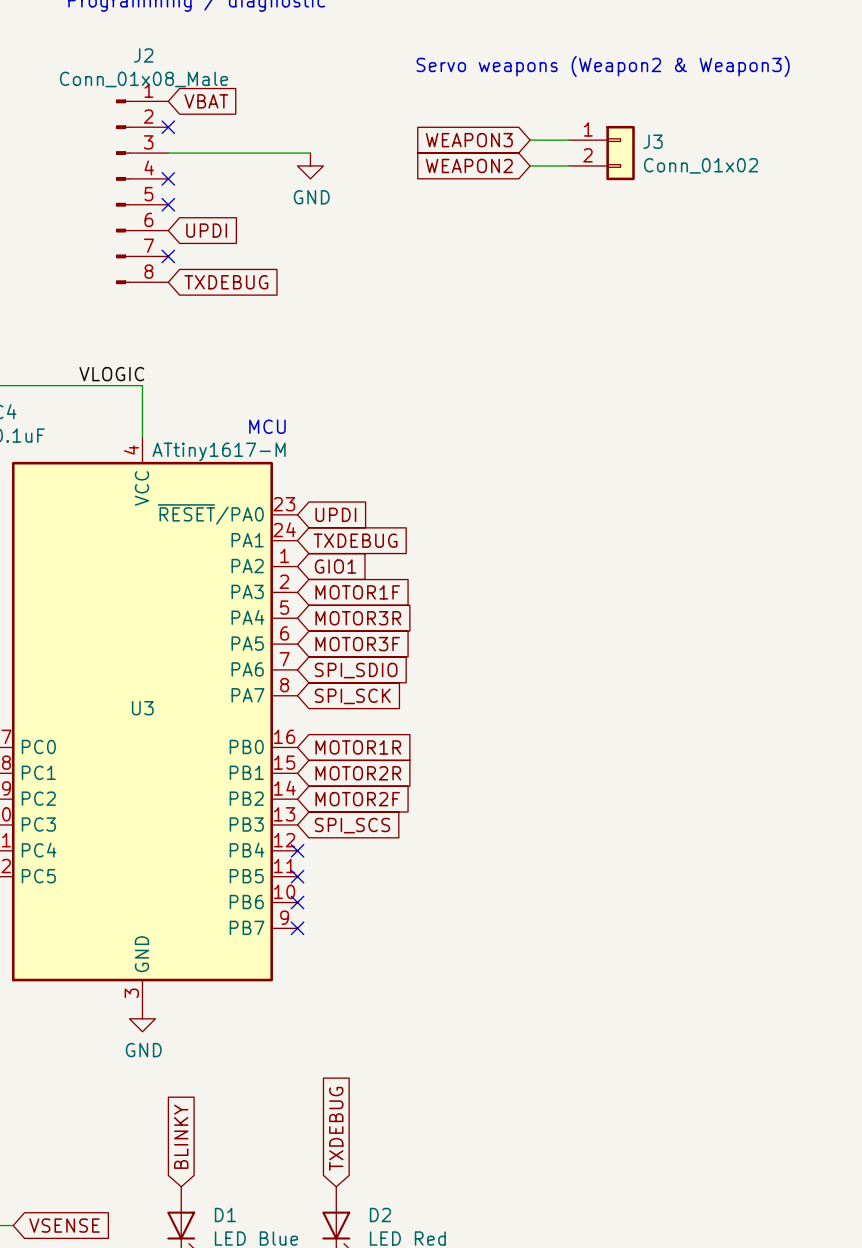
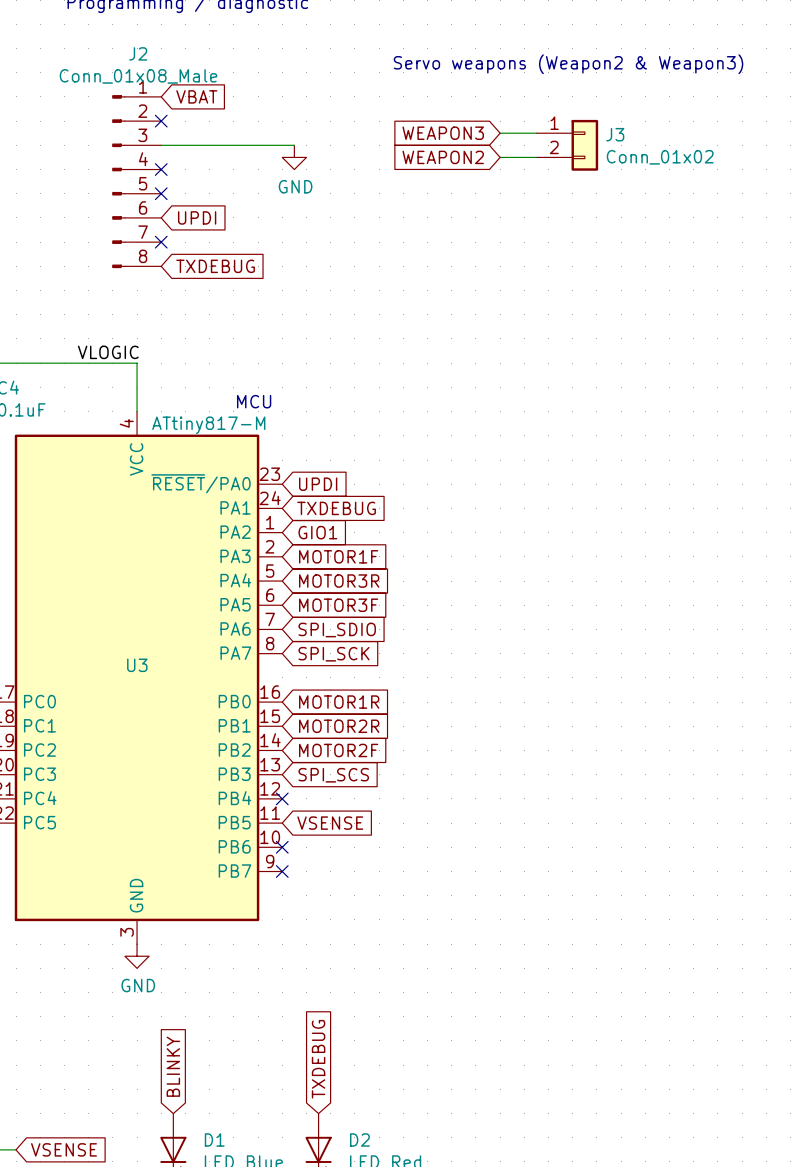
U3 value: ATtiny1617-M (219, 451) -> ATtiny817-M (208, 425)
no-connect mark: (297, 876) -> none
global label: none -> VSENSE (330, 823)

